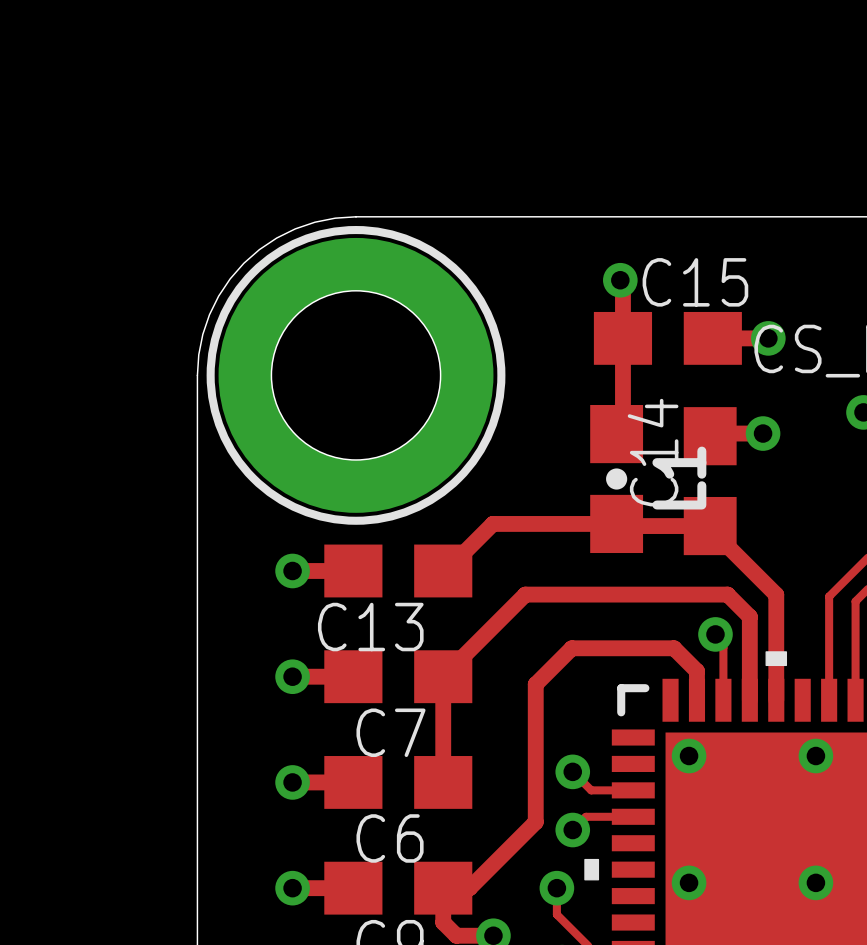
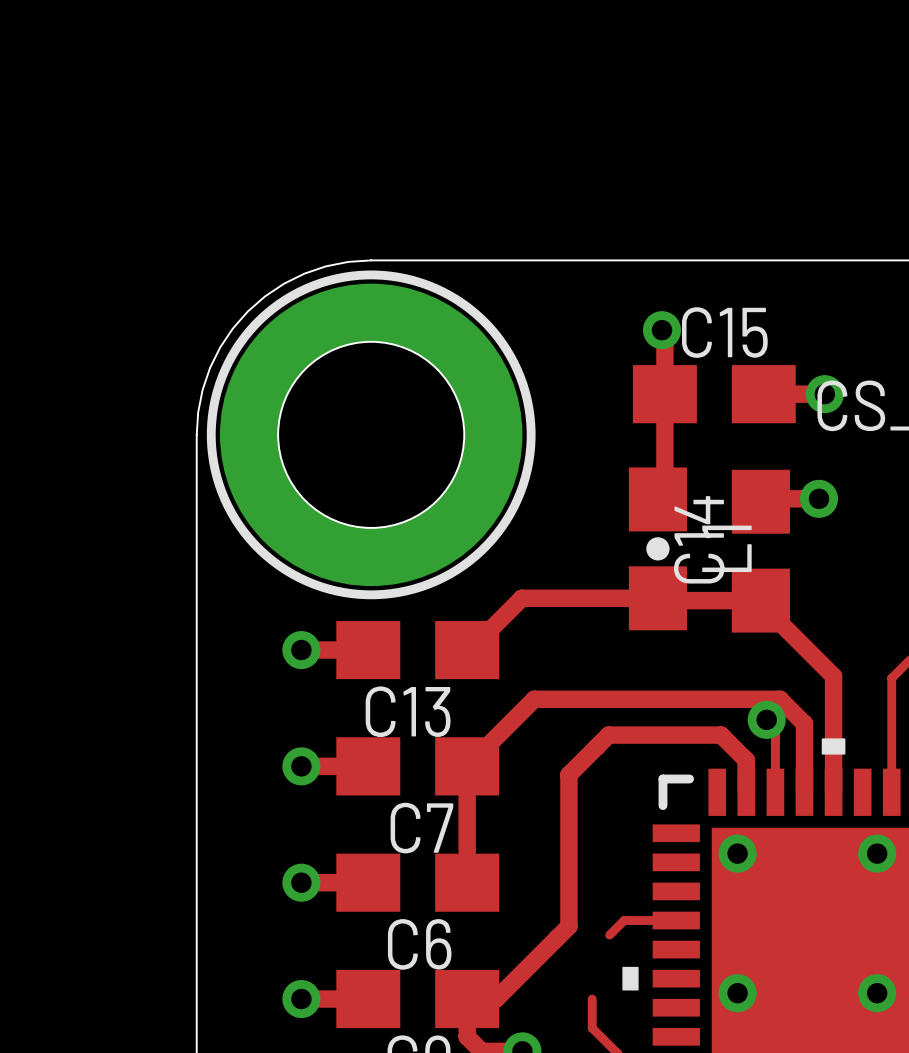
track: (504, 615) (525, 594) (727, 594) (749, 616) (749, 637) -> (534, 699) (780, 699) (804, 723)
track: (572, 771) (591, 790) (633, 790) -> none
via: (572, 771) -> none
via: (572, 830) -> none
via: (556, 888) -> none

